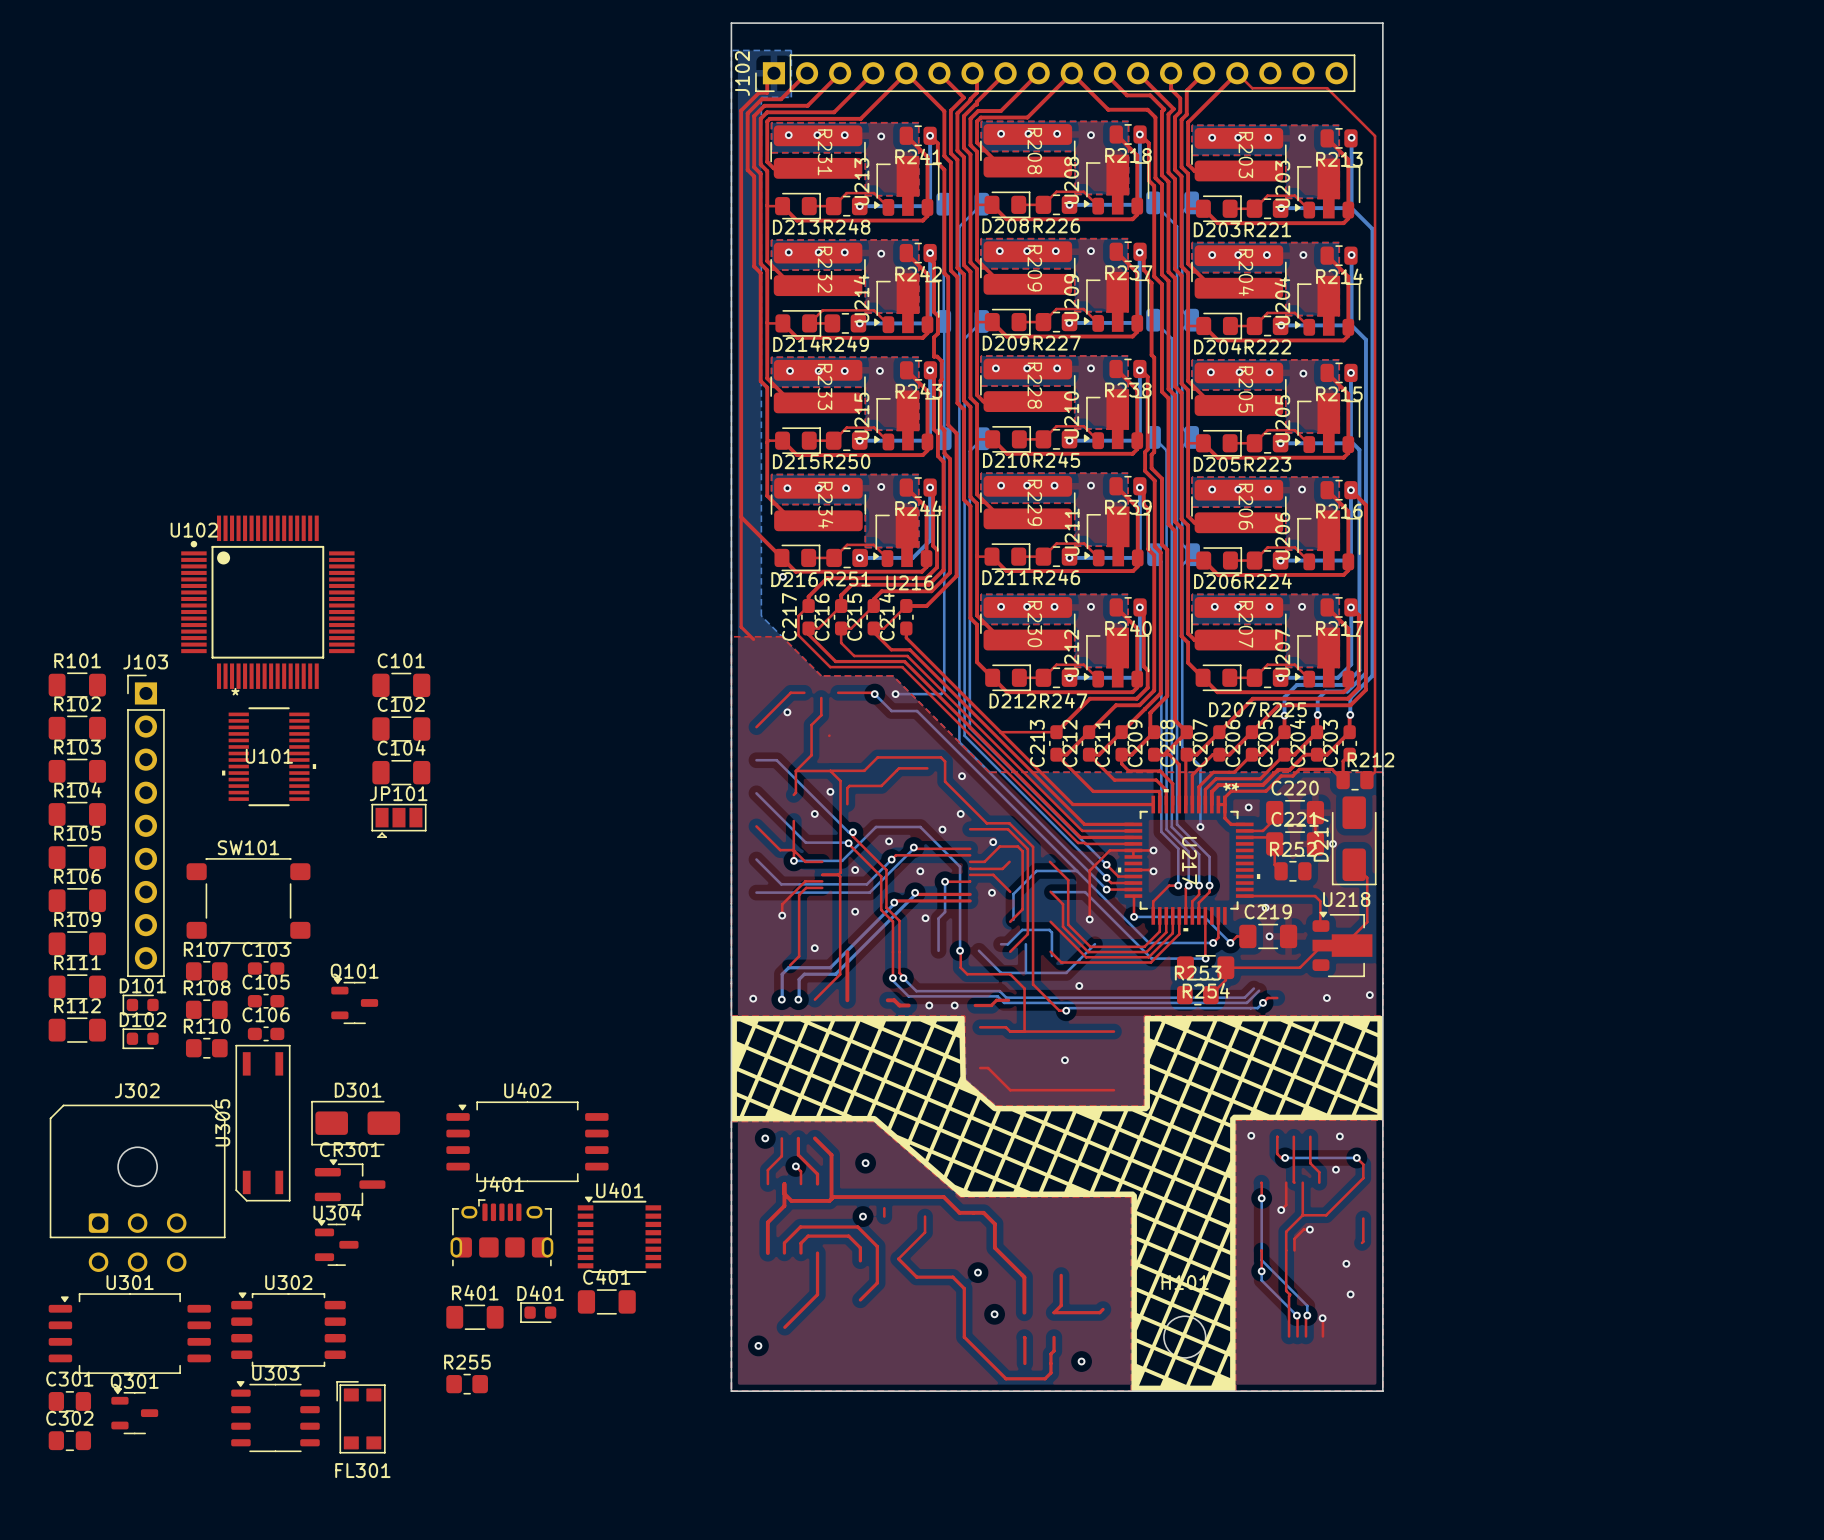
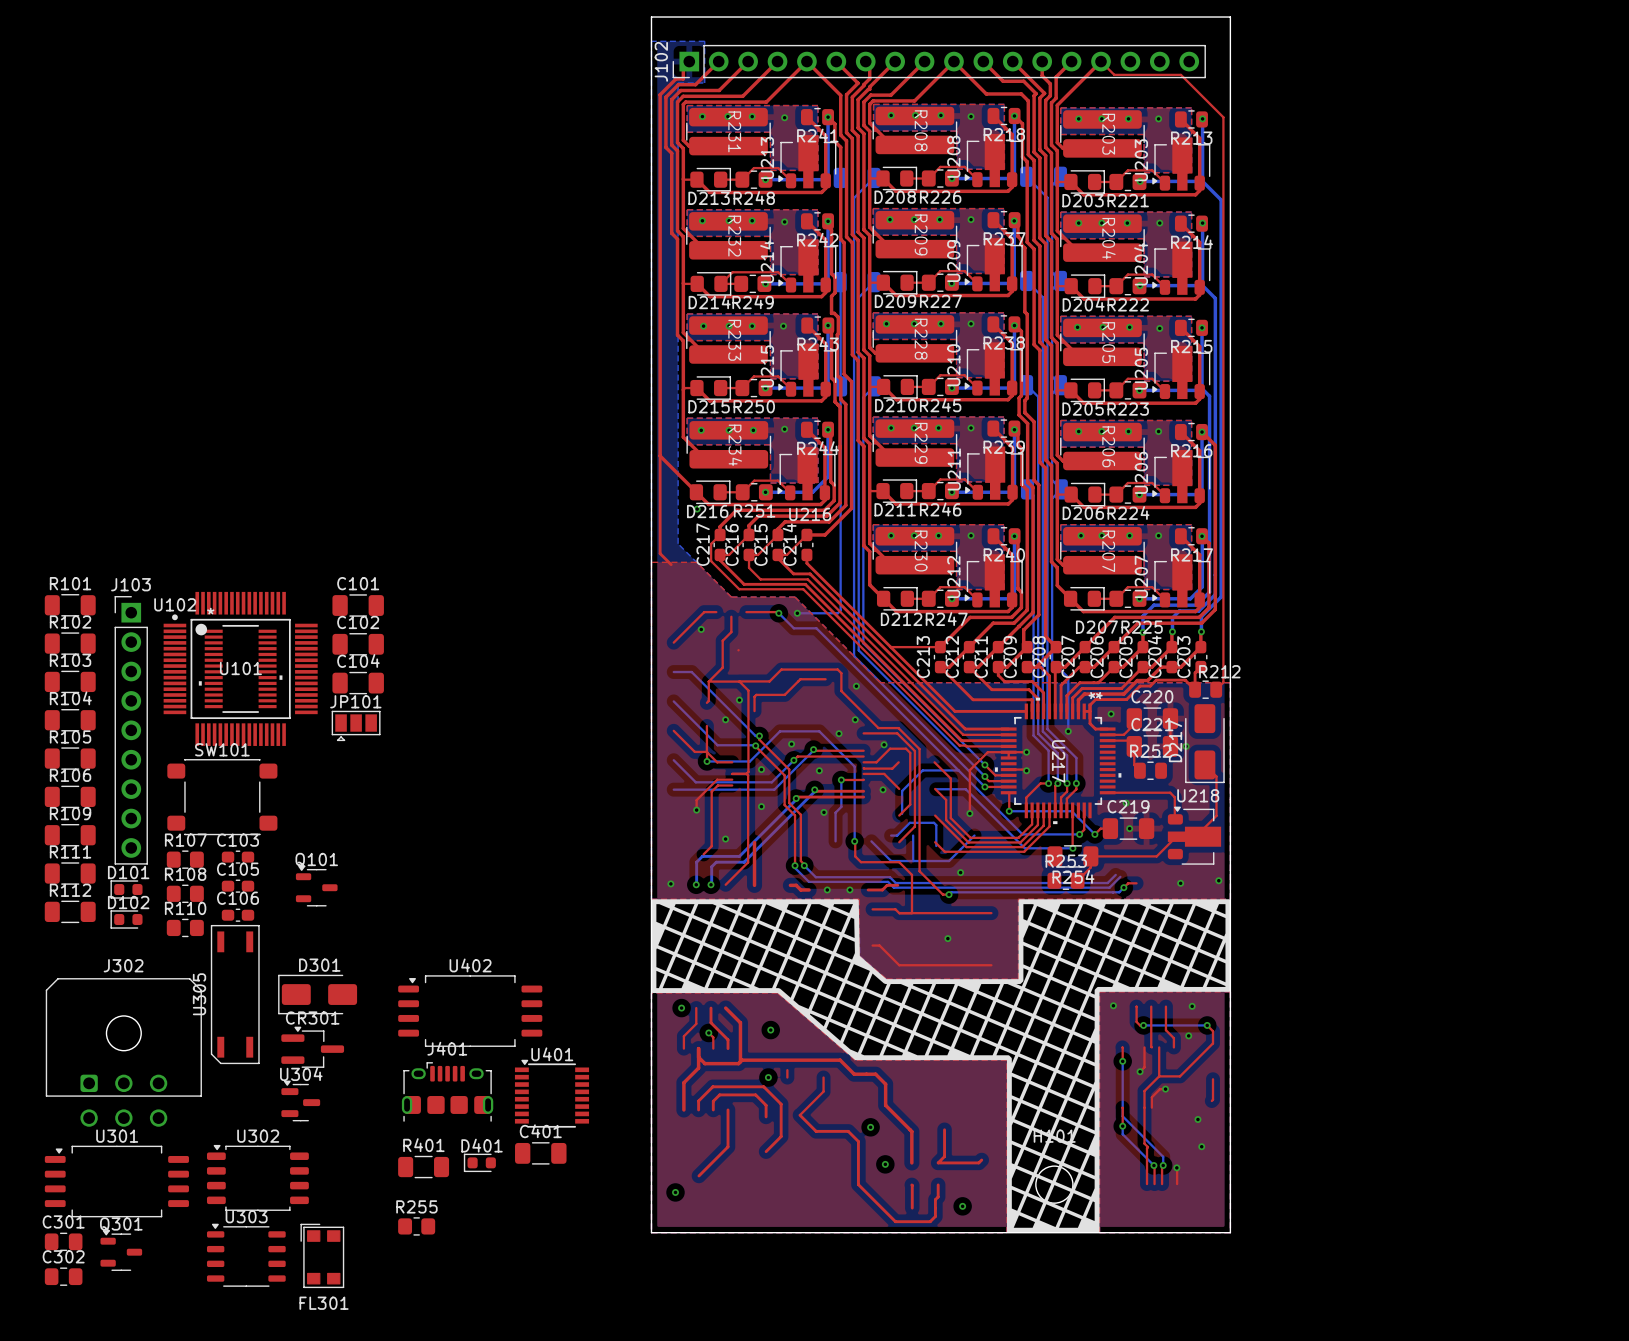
U102 position: (267, 602) -> (240, 668)

